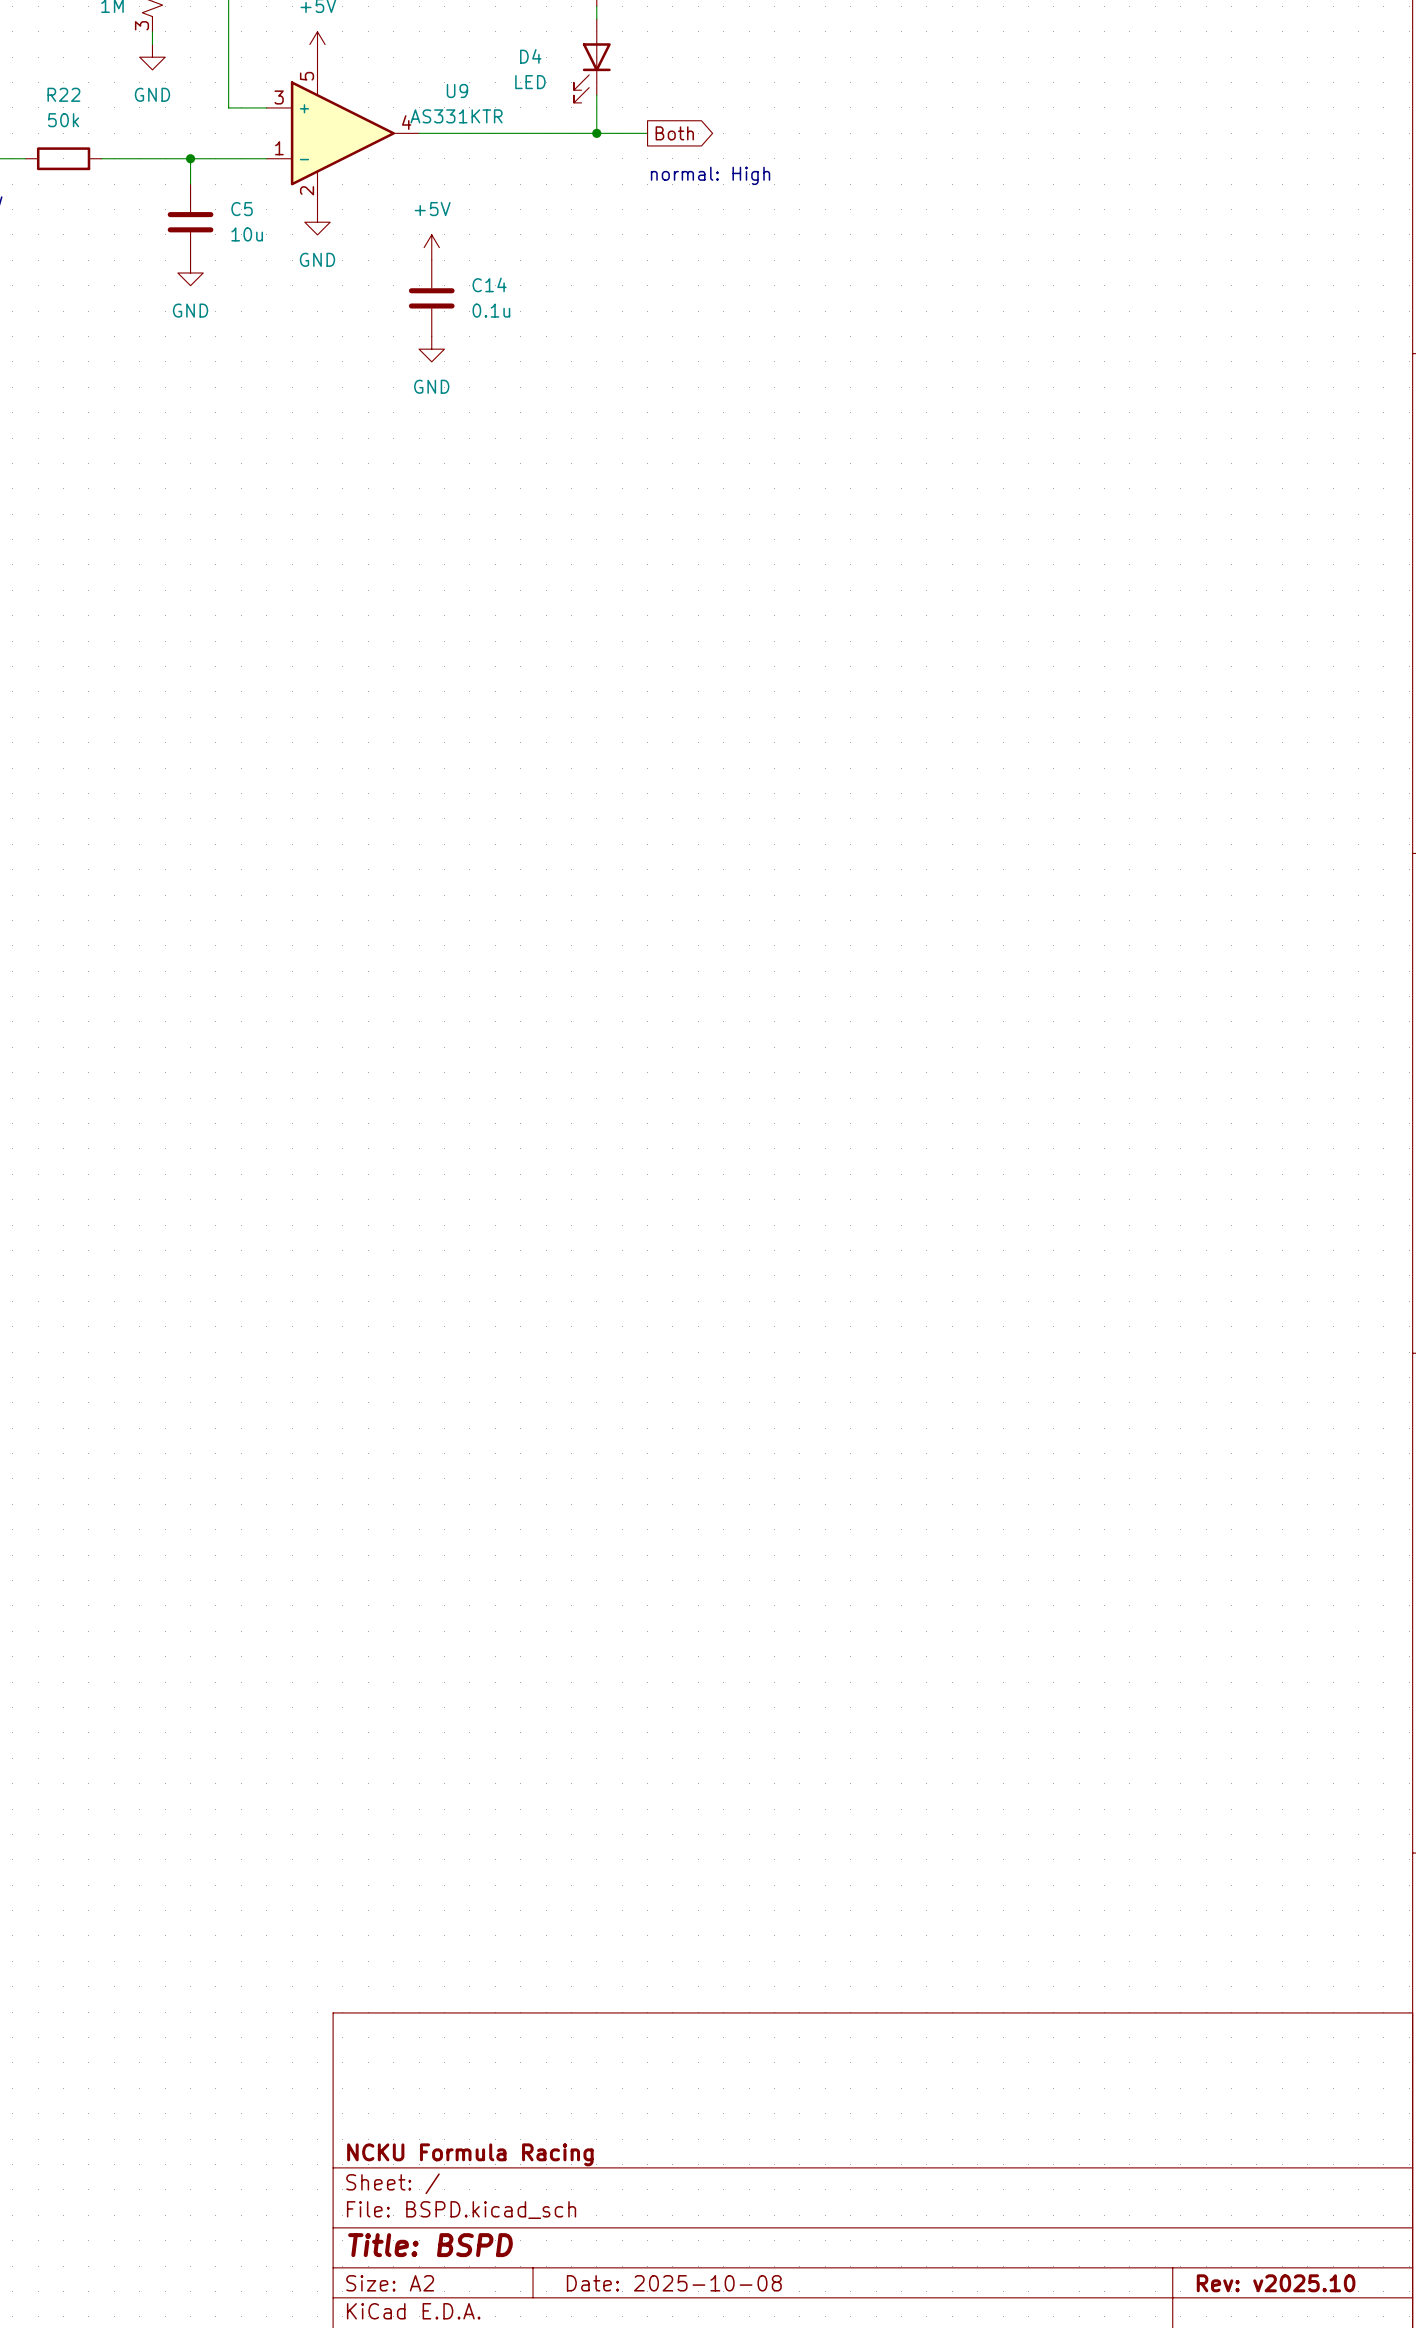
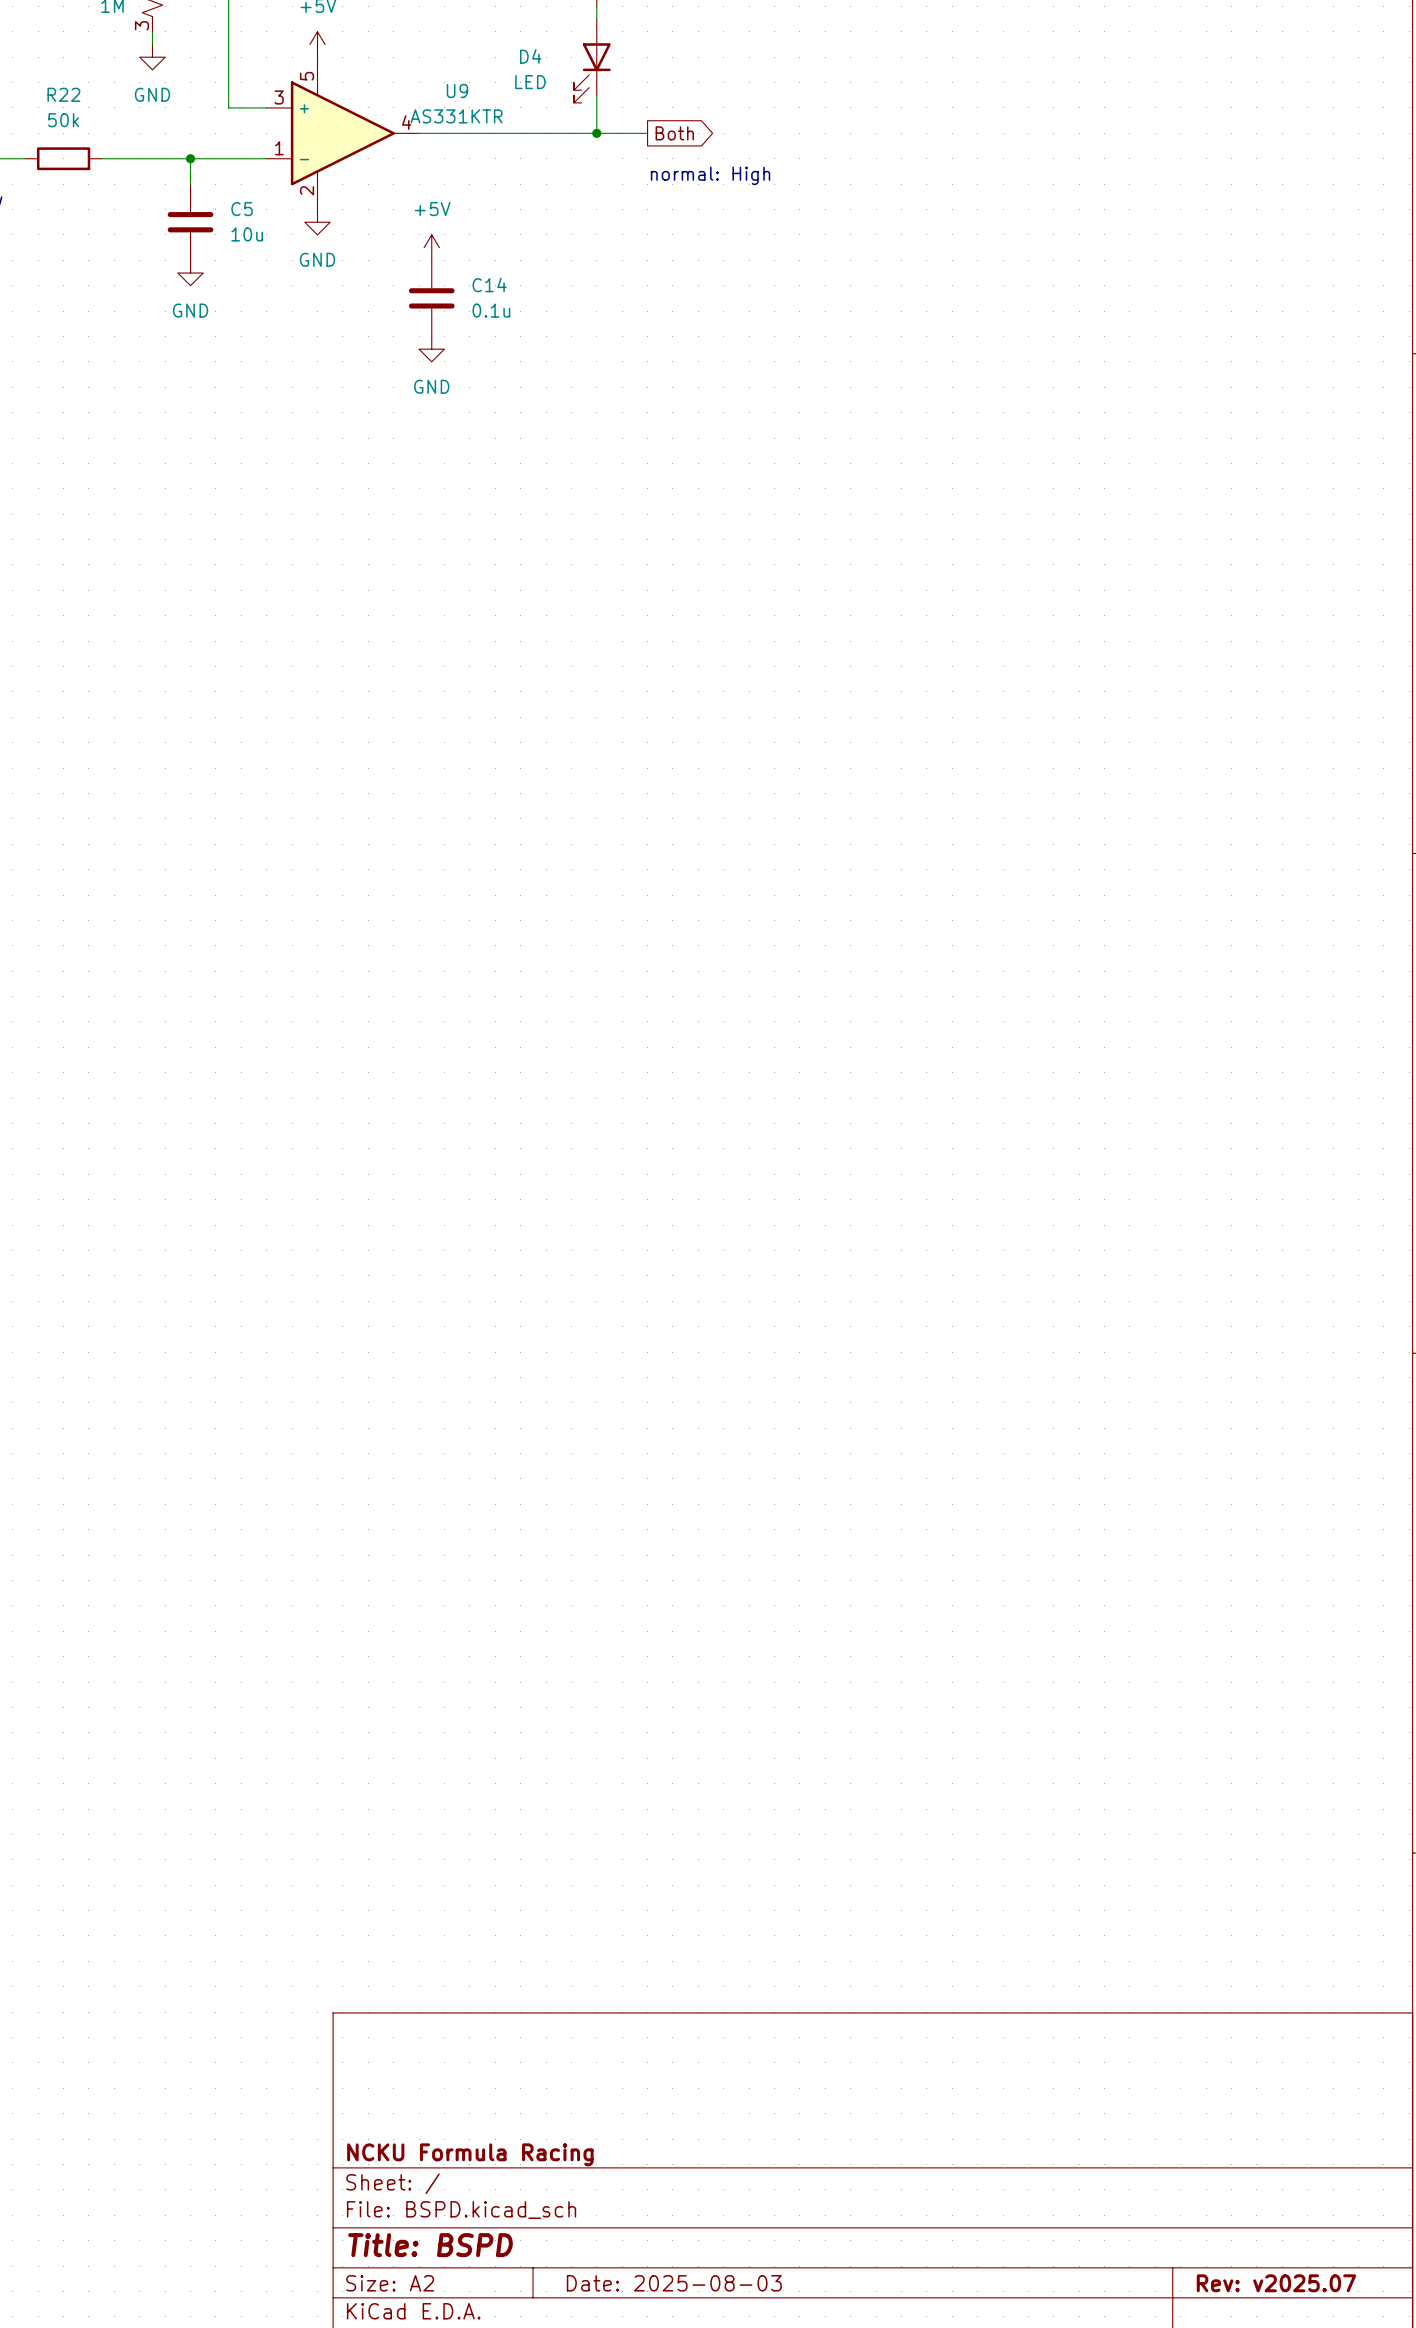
title block: Date: 2025-10-08 (674, 2283) -> Date: 2025-08-03 (674, 2283)
title block: Rev: v2025.10 (1276, 2283) -> Rev: v2025.07 (1276, 2283)

